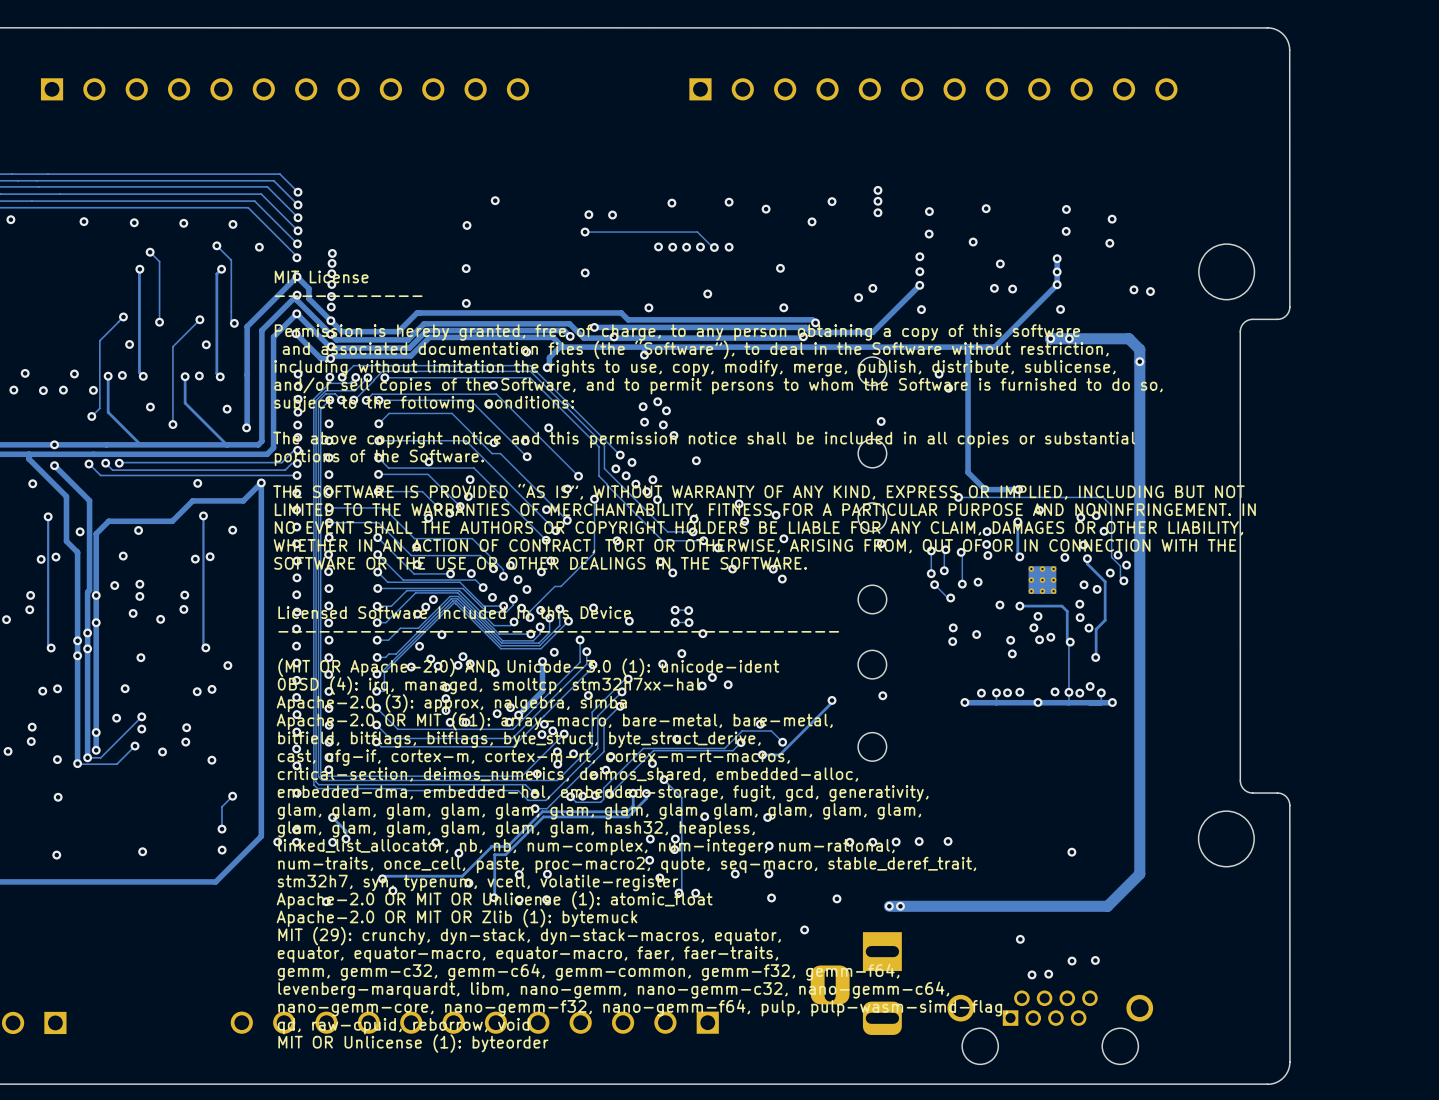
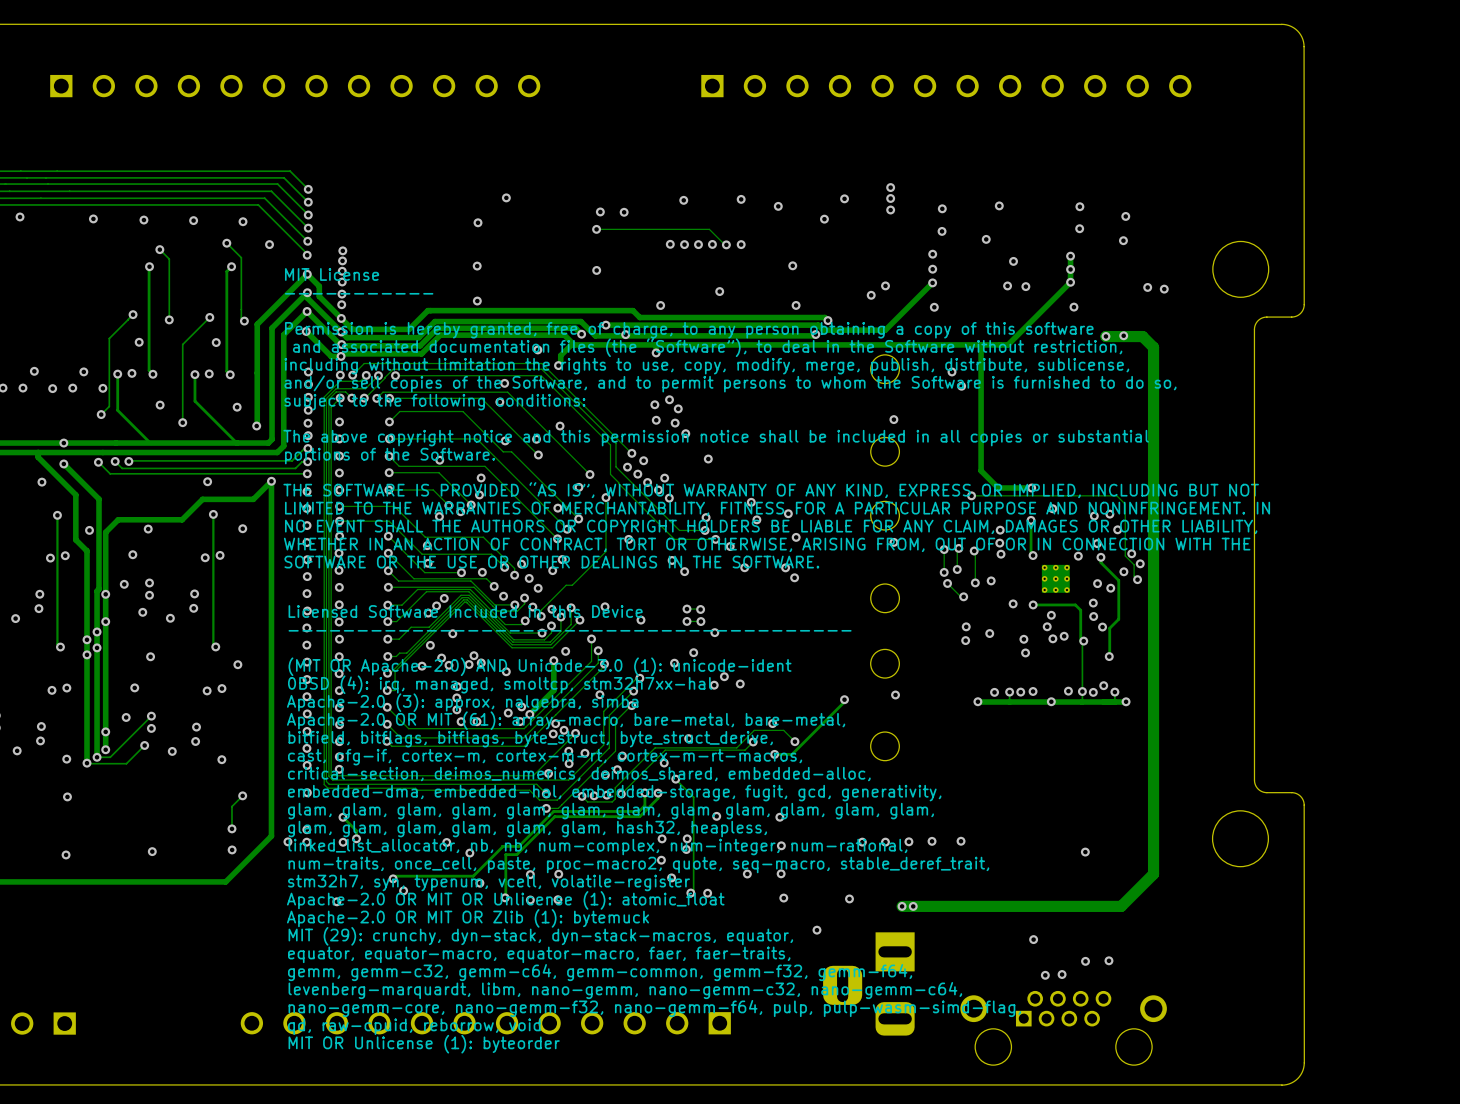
via: none -> (1123, 335)
via: (1050, 338) -> none
via: (1069, 338) -> none
track: (1092, 338) (1050, 338) -> none
via: none -> (1105, 336)
via: (1139, 361) -> none

